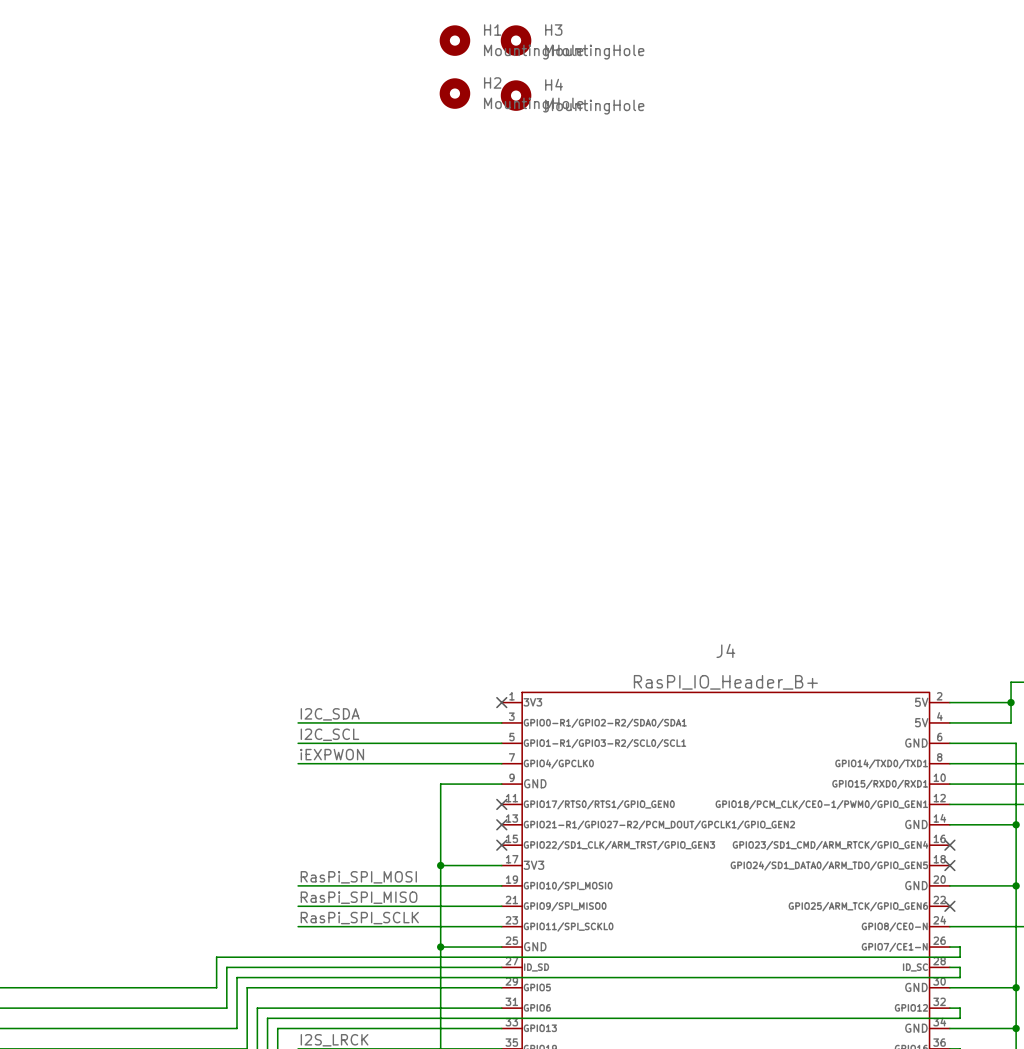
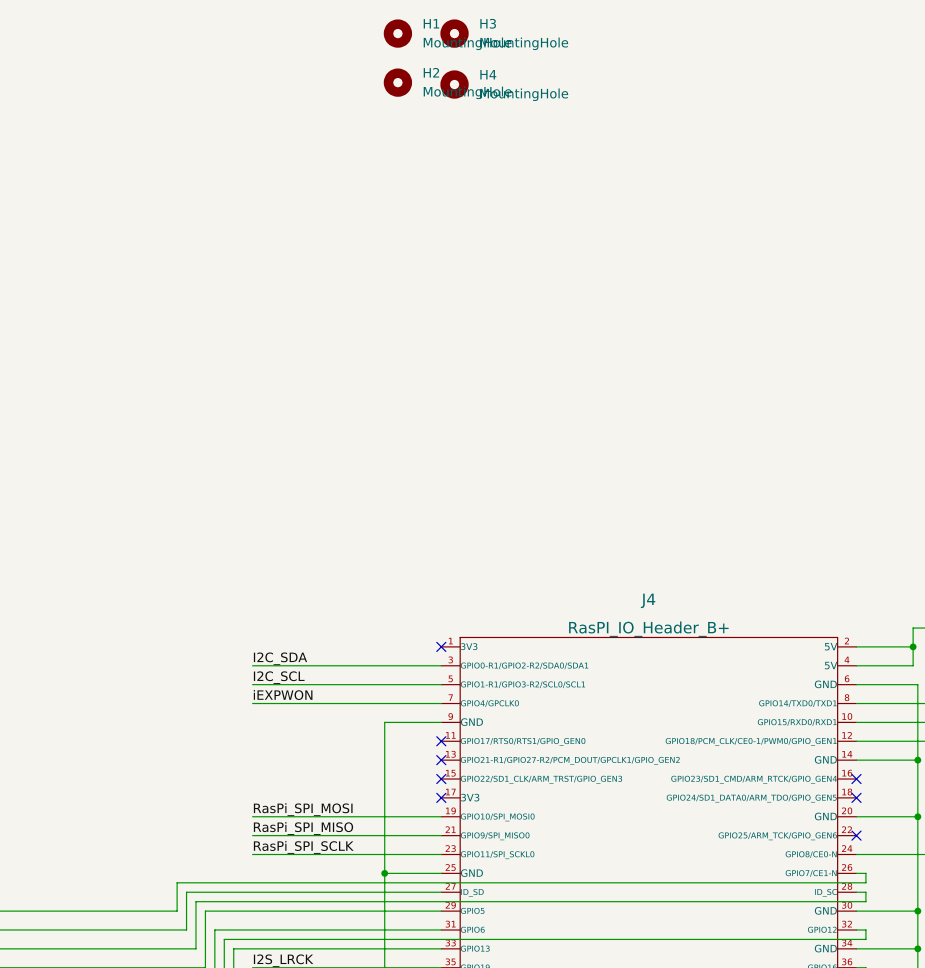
wire: (440, 865) (501, 865) -> none
junction: (440, 865) -> none
no-connect mark: none -> (441, 797)

